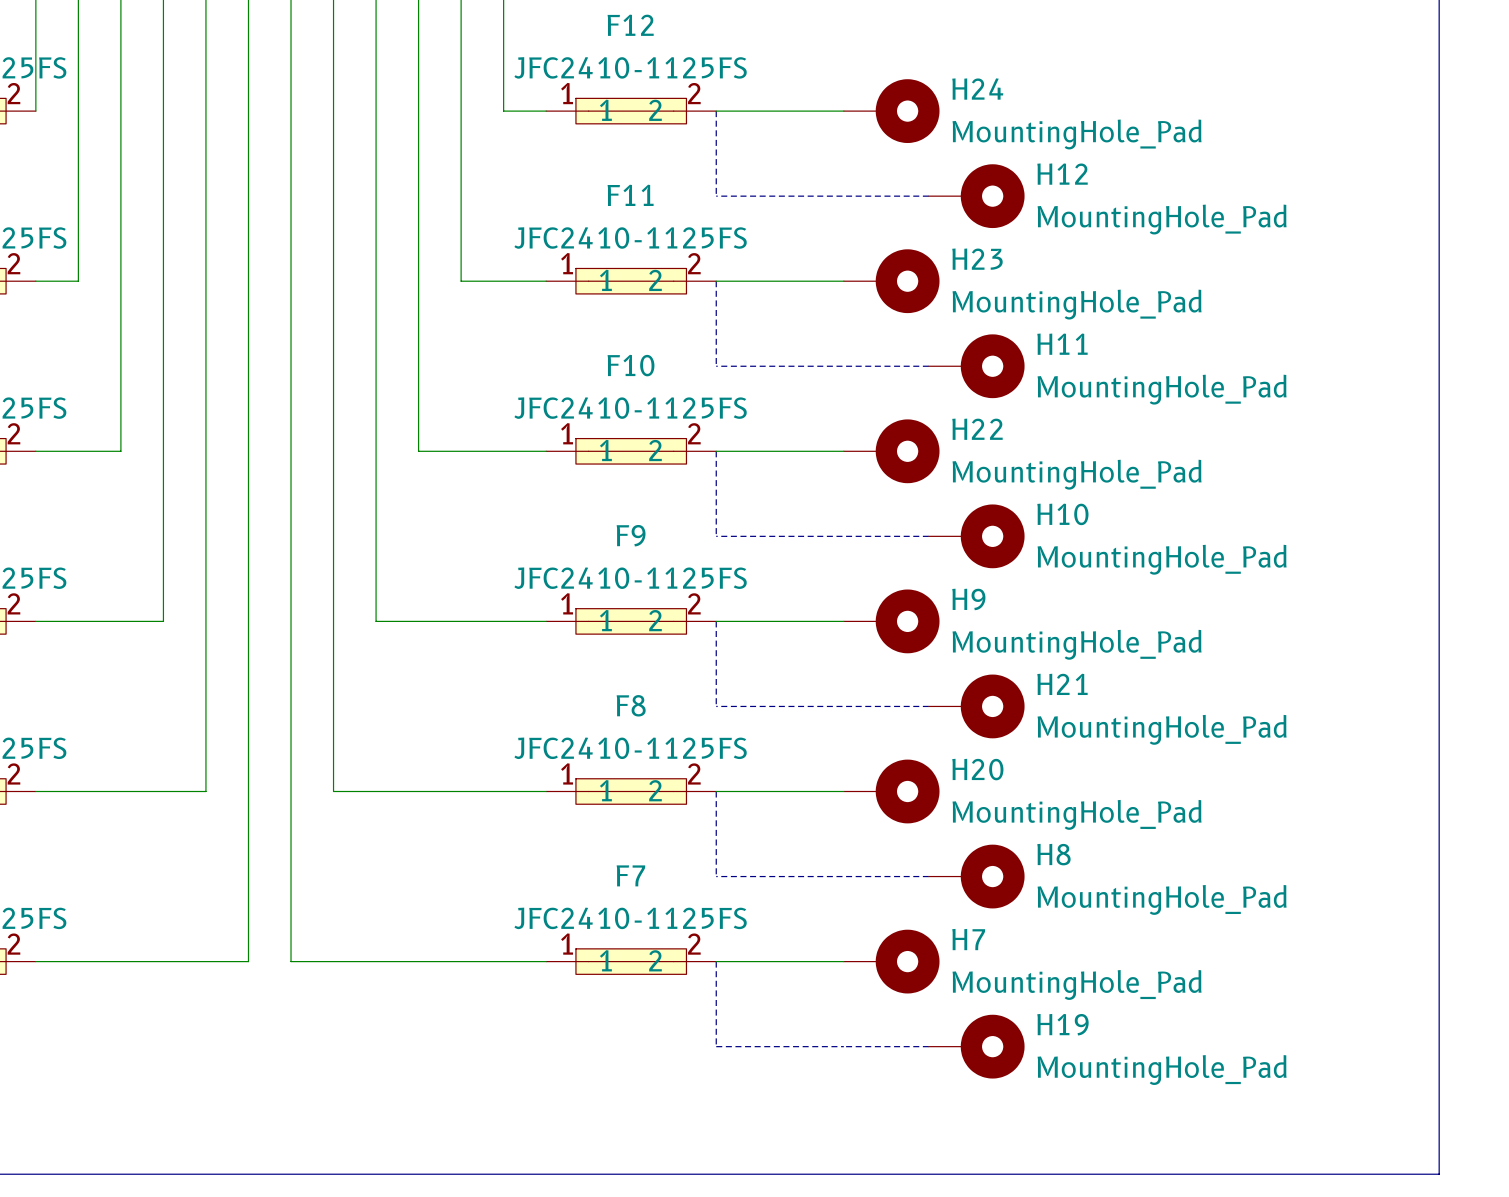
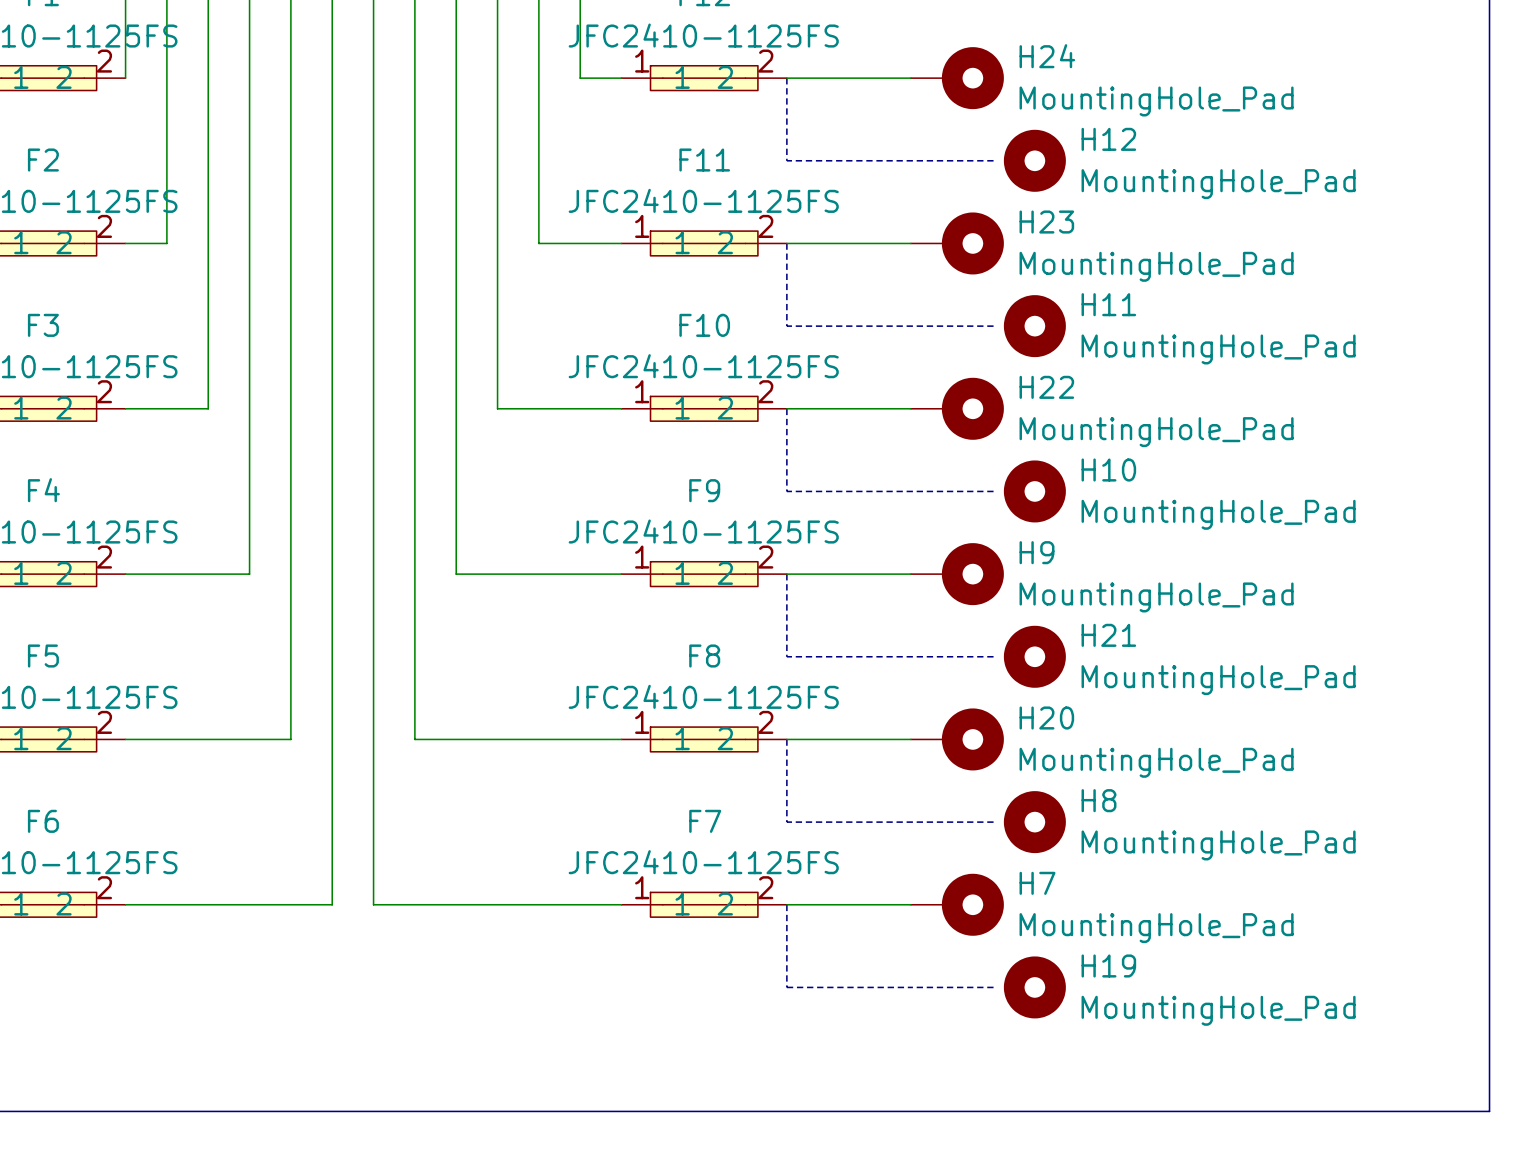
H12 symbol: [928, 164, 1025, 229] -> [1003, 129, 1066, 192]
H11 symbol: [928, 334, 1025, 399] -> [1003, 295, 1066, 358]
H10 symbol: [928, 504, 1025, 569] -> [1003, 460, 1066, 523]
H21 symbol: [928, 674, 1025, 739] -> [1003, 625, 1066, 688]
H8 symbol: [928, 844, 1025, 909] -> [1003, 791, 1066, 854]
H19 symbol: [928, 1014, 1025, 1079] -> [1003, 956, 1066, 1019]

